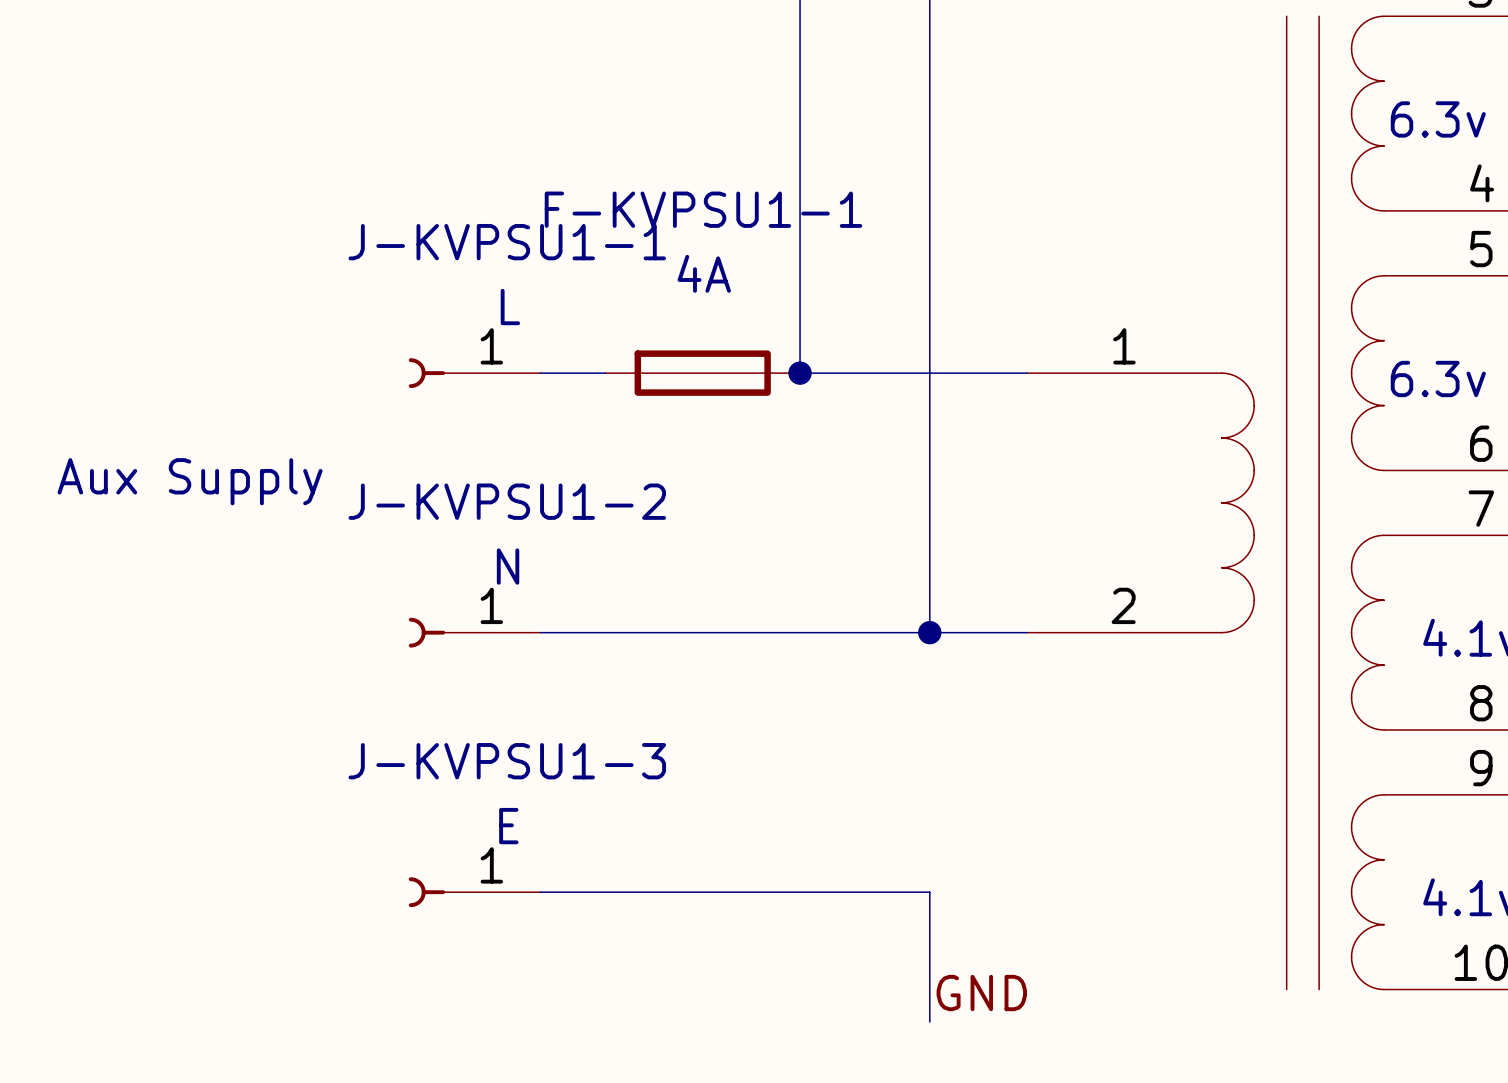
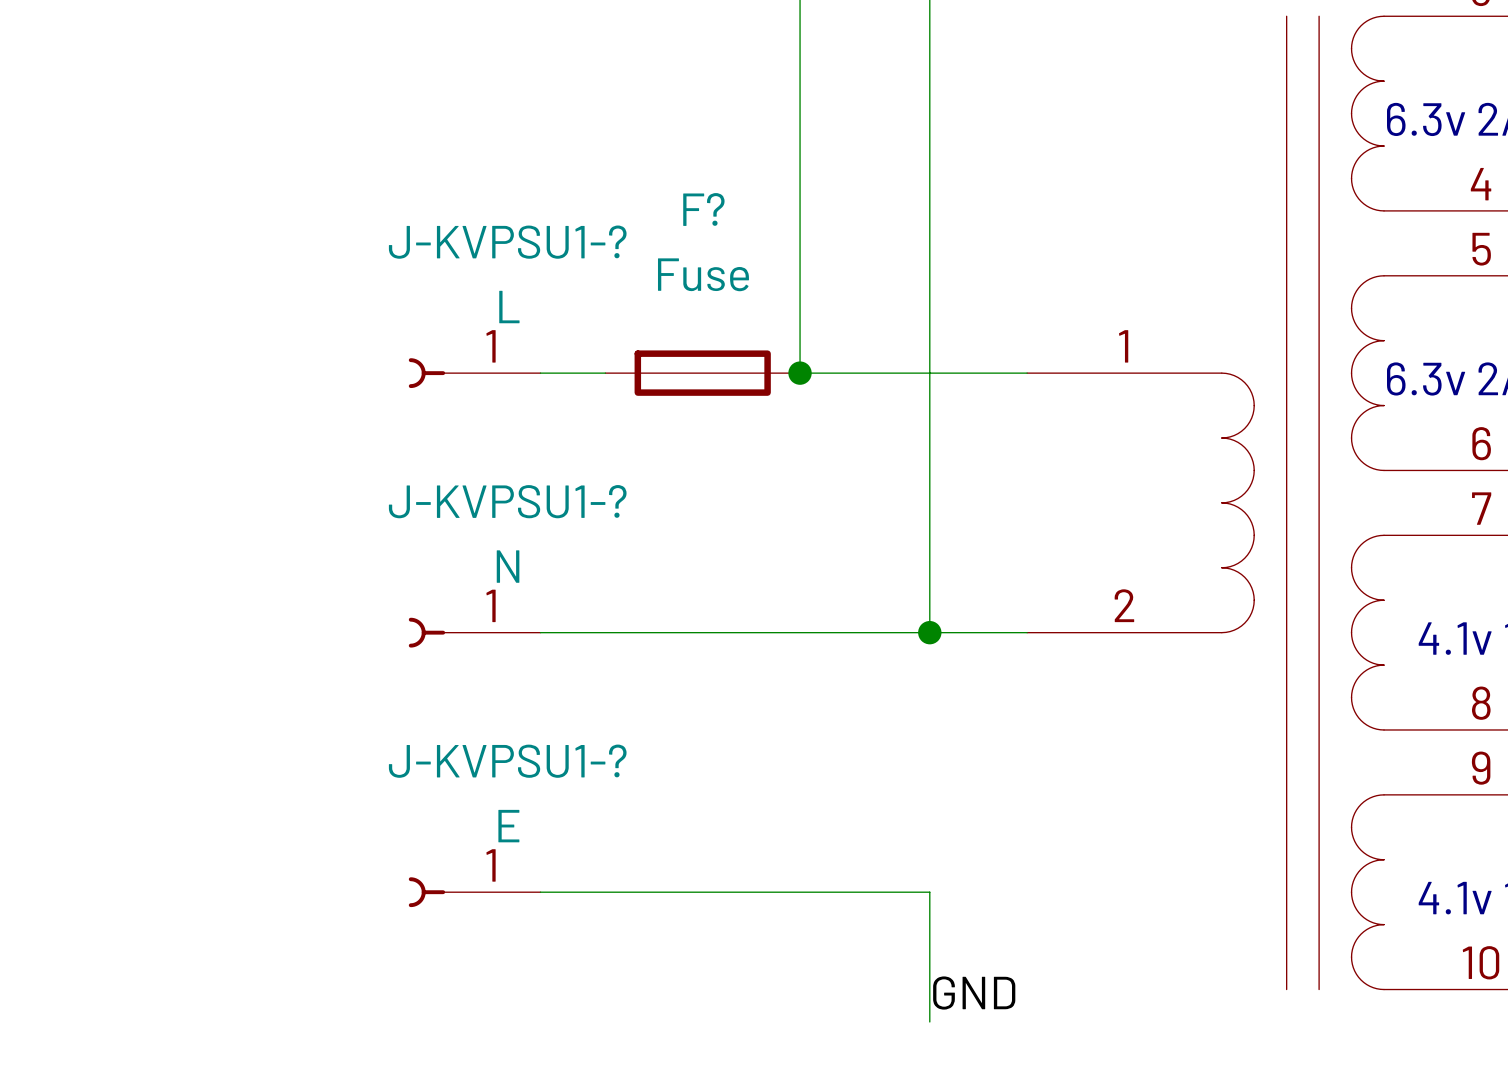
F-KVPSU1-1 name: F-KVPSU1-1 (703, 209) -> F? (703, 209)
J-KVPSU1-1 name: J-KVPSU1-1 (507, 242) -> J-KVPSU1-? (507, 242)
F-KVPSU1-1 value: 4A (704, 273) -> Fuse (703, 274)
text: Aux Supply (190, 481) -> none
J-KVPSU1-2 name: J-KVPSU1-2 (507, 501) -> J-KVPSU1-? (507, 501)
J-KVPSU1-3 name: J-KVPSU1-3 (507, 761) -> J-KVPSU1-? (507, 761)

